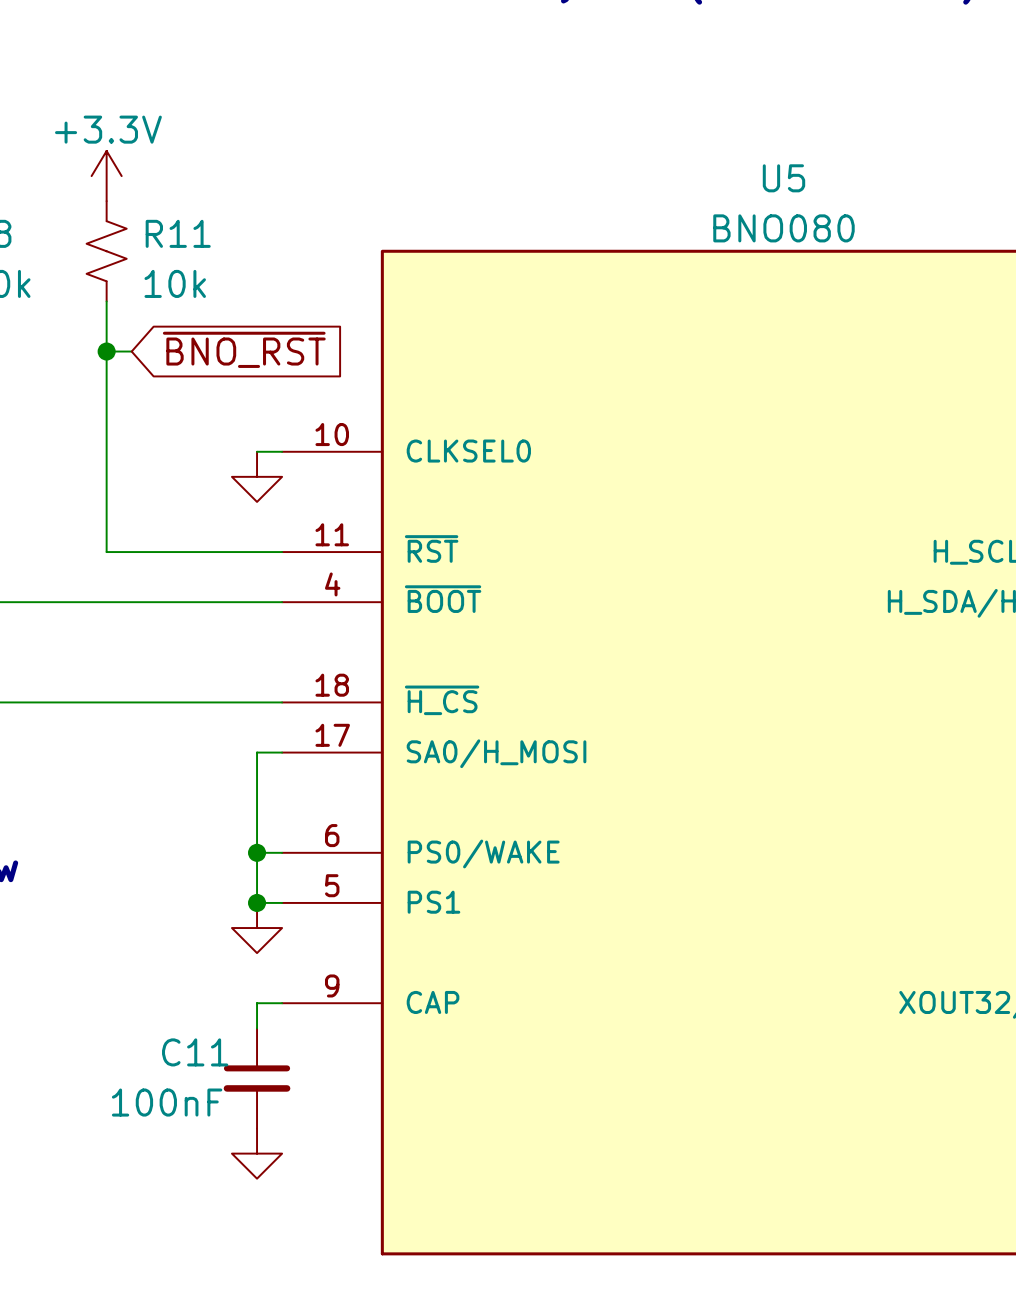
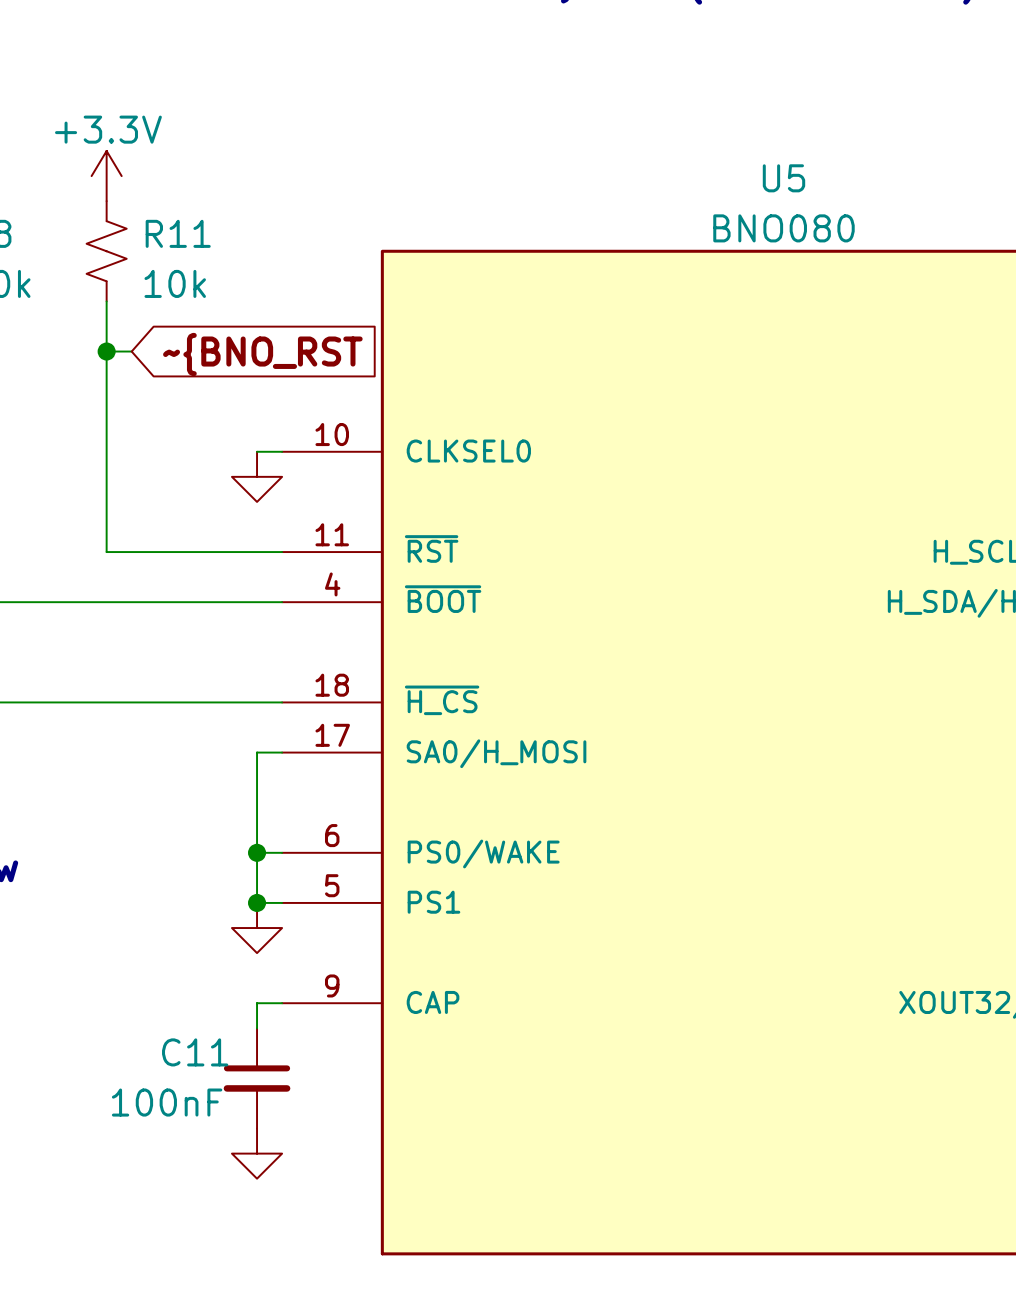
global label: ~{BNO_RST} (244, 349) -> ~{BNO_RST (262, 354)

